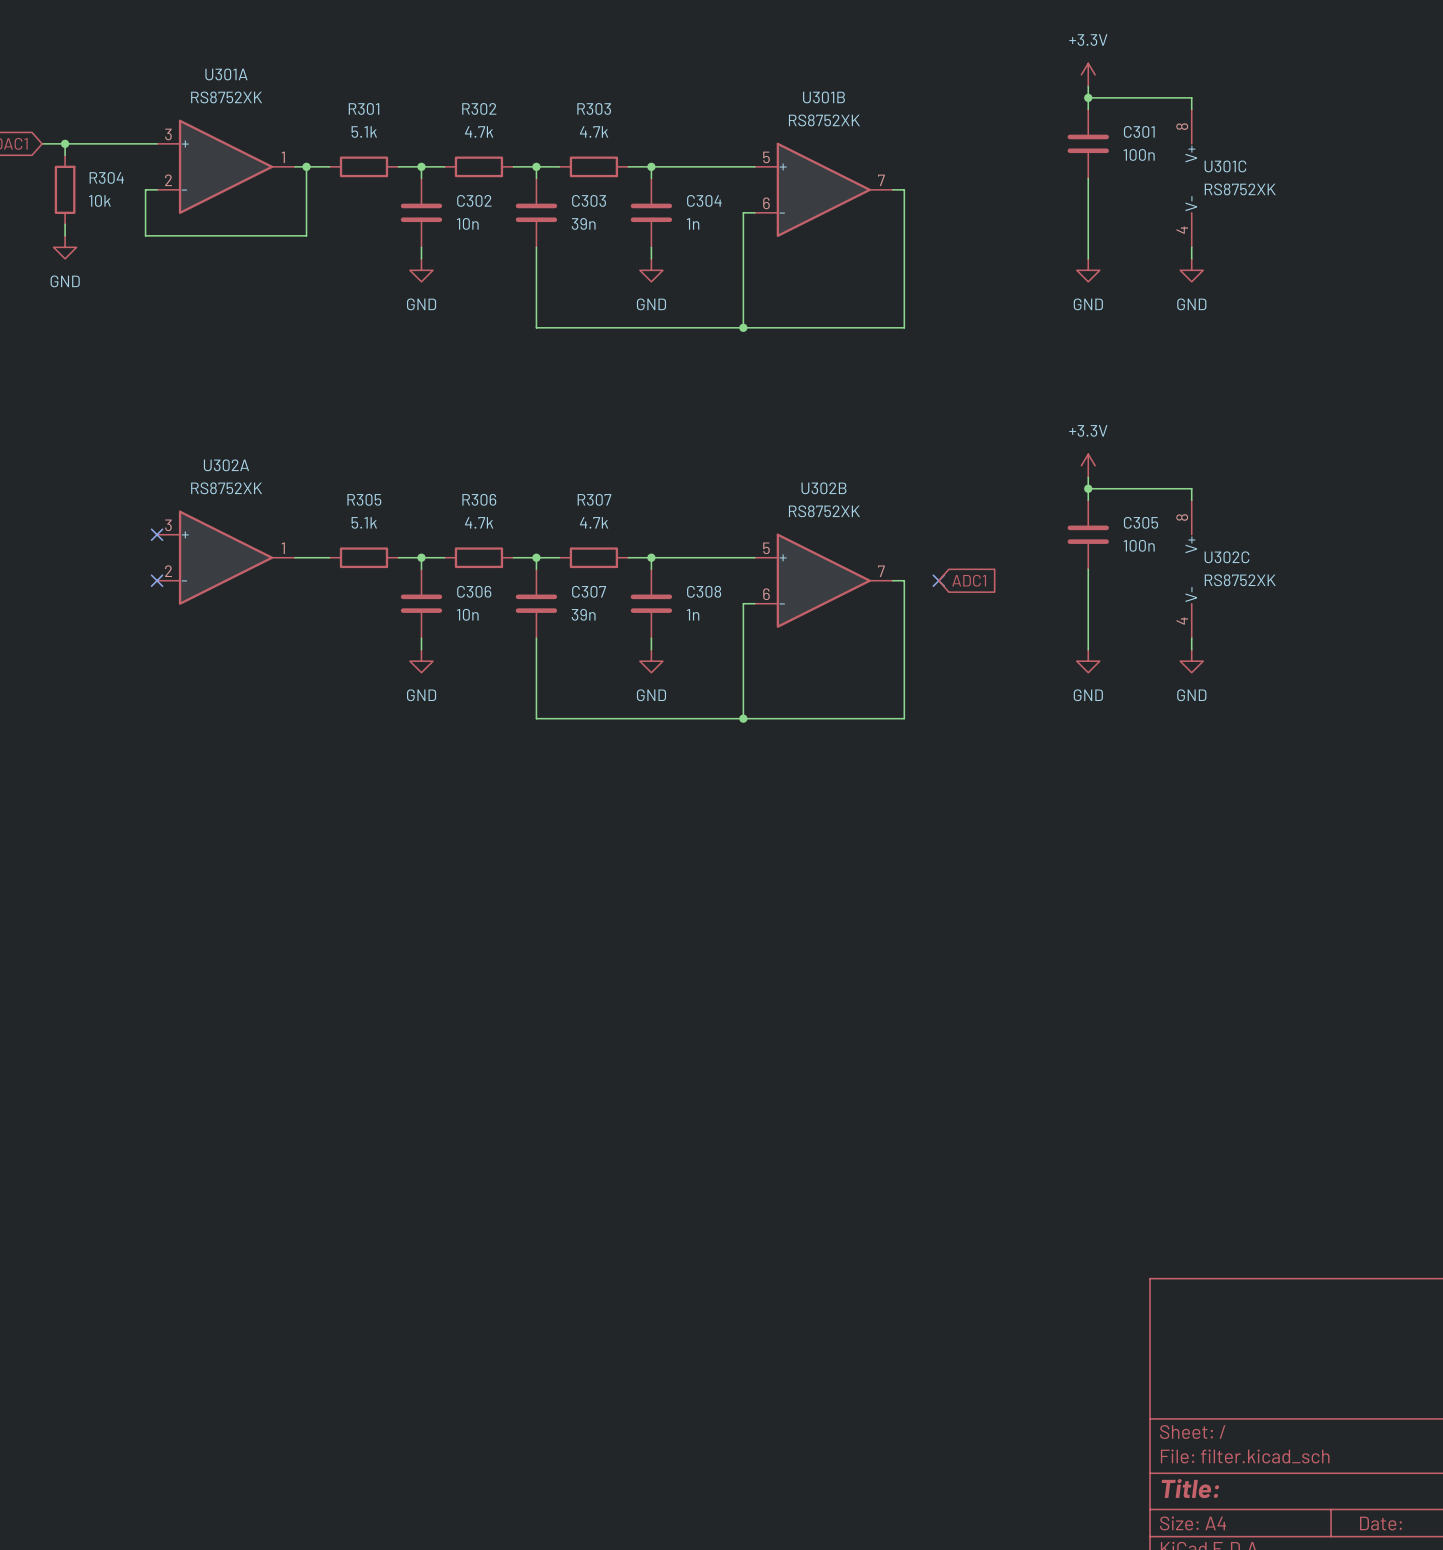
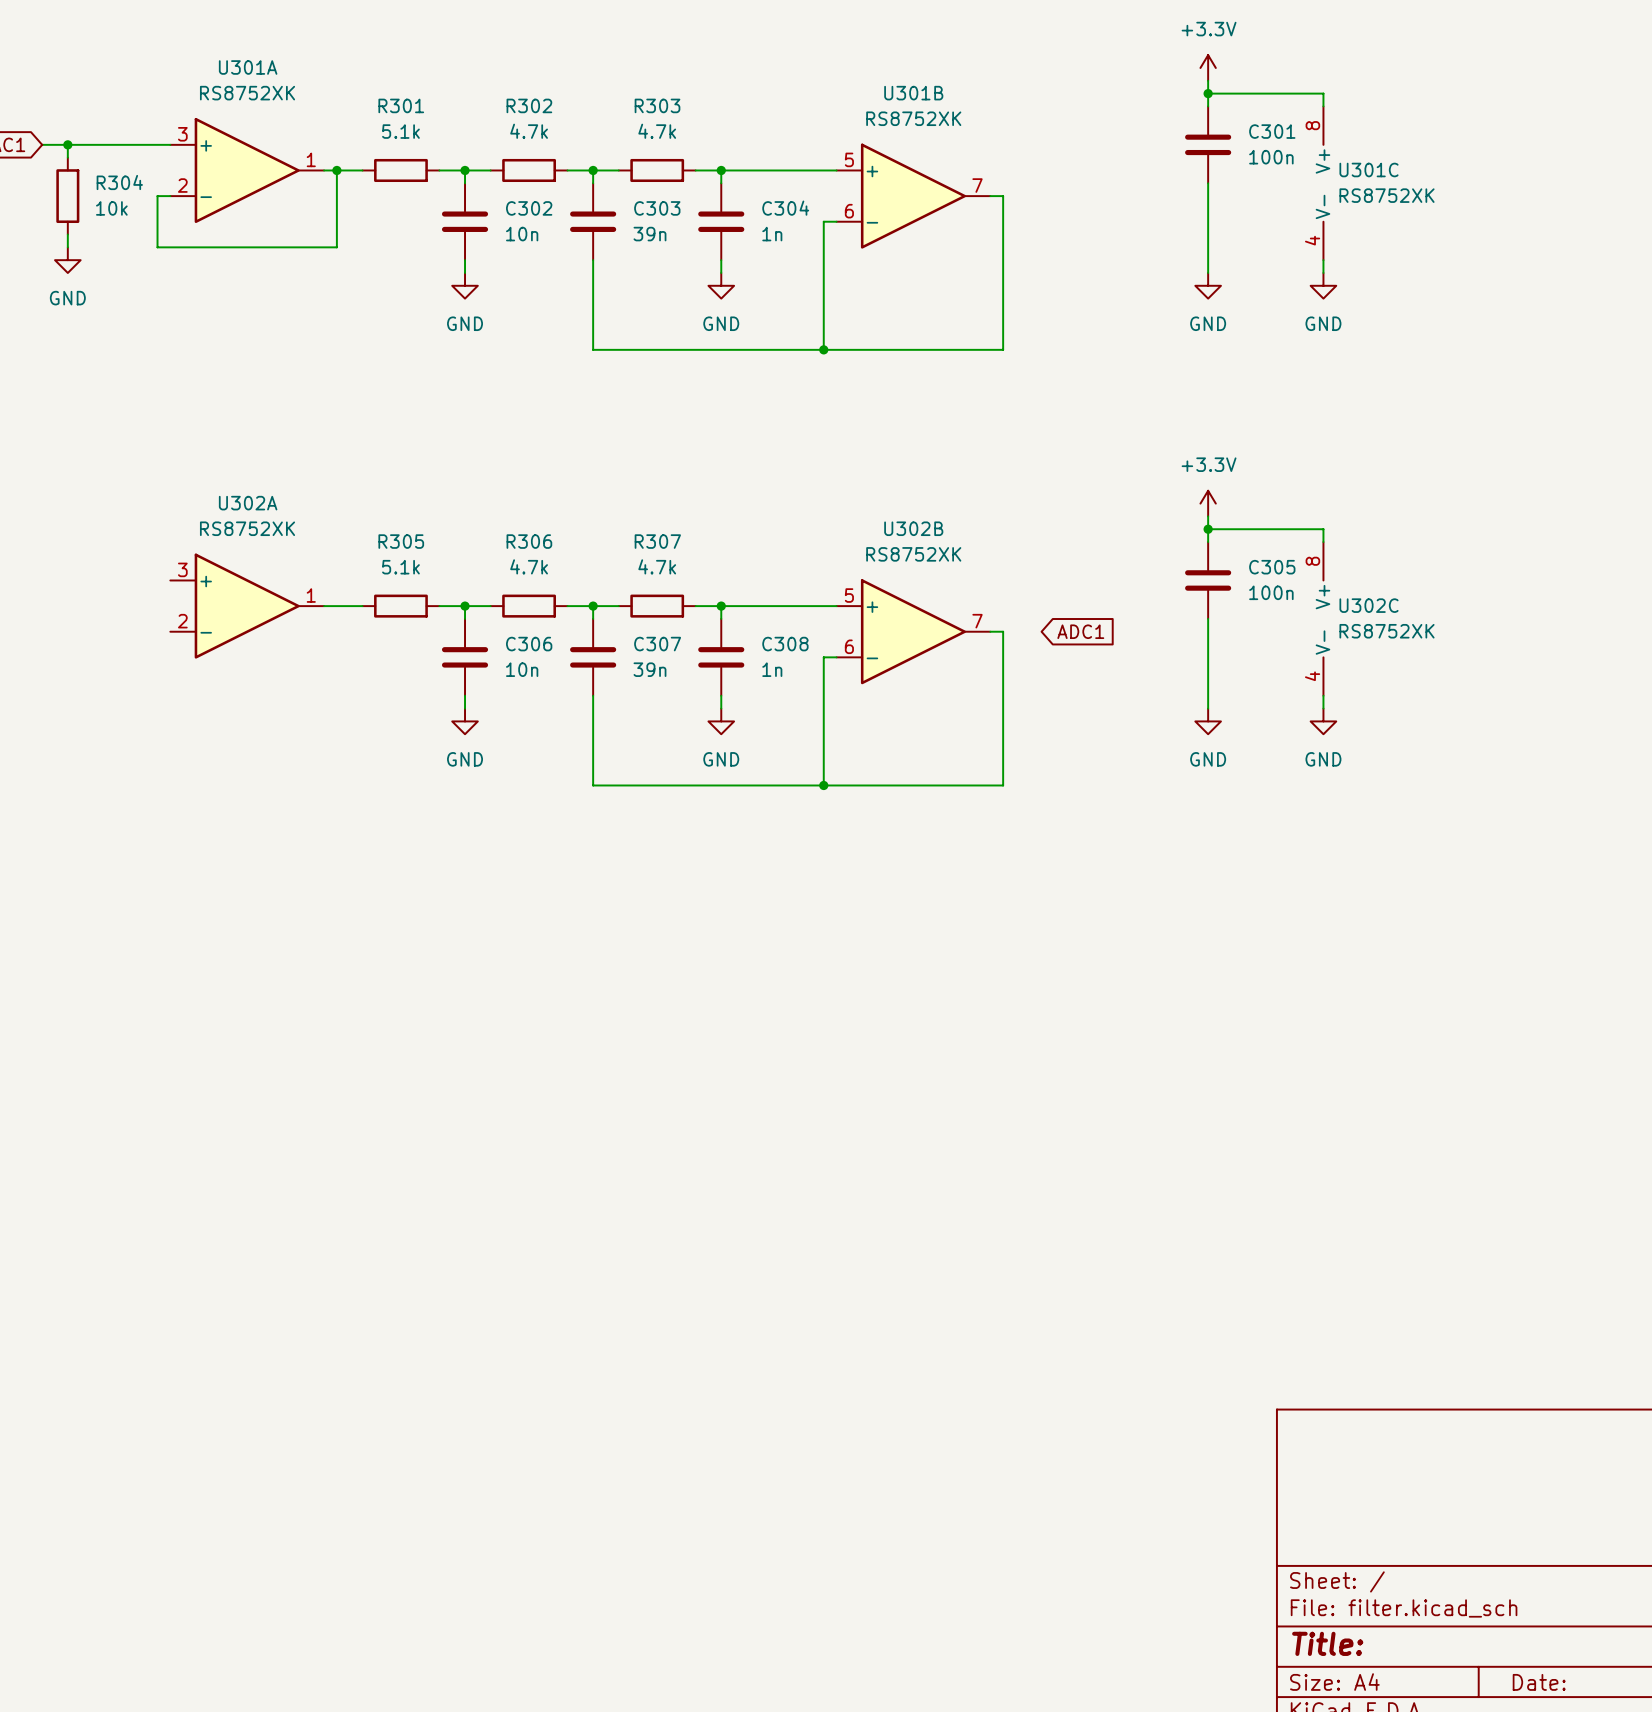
no-connect mark: (157, 534) -> none
no-connect mark: (157, 580) -> none
no-connect mark: (938, 580) -> none

